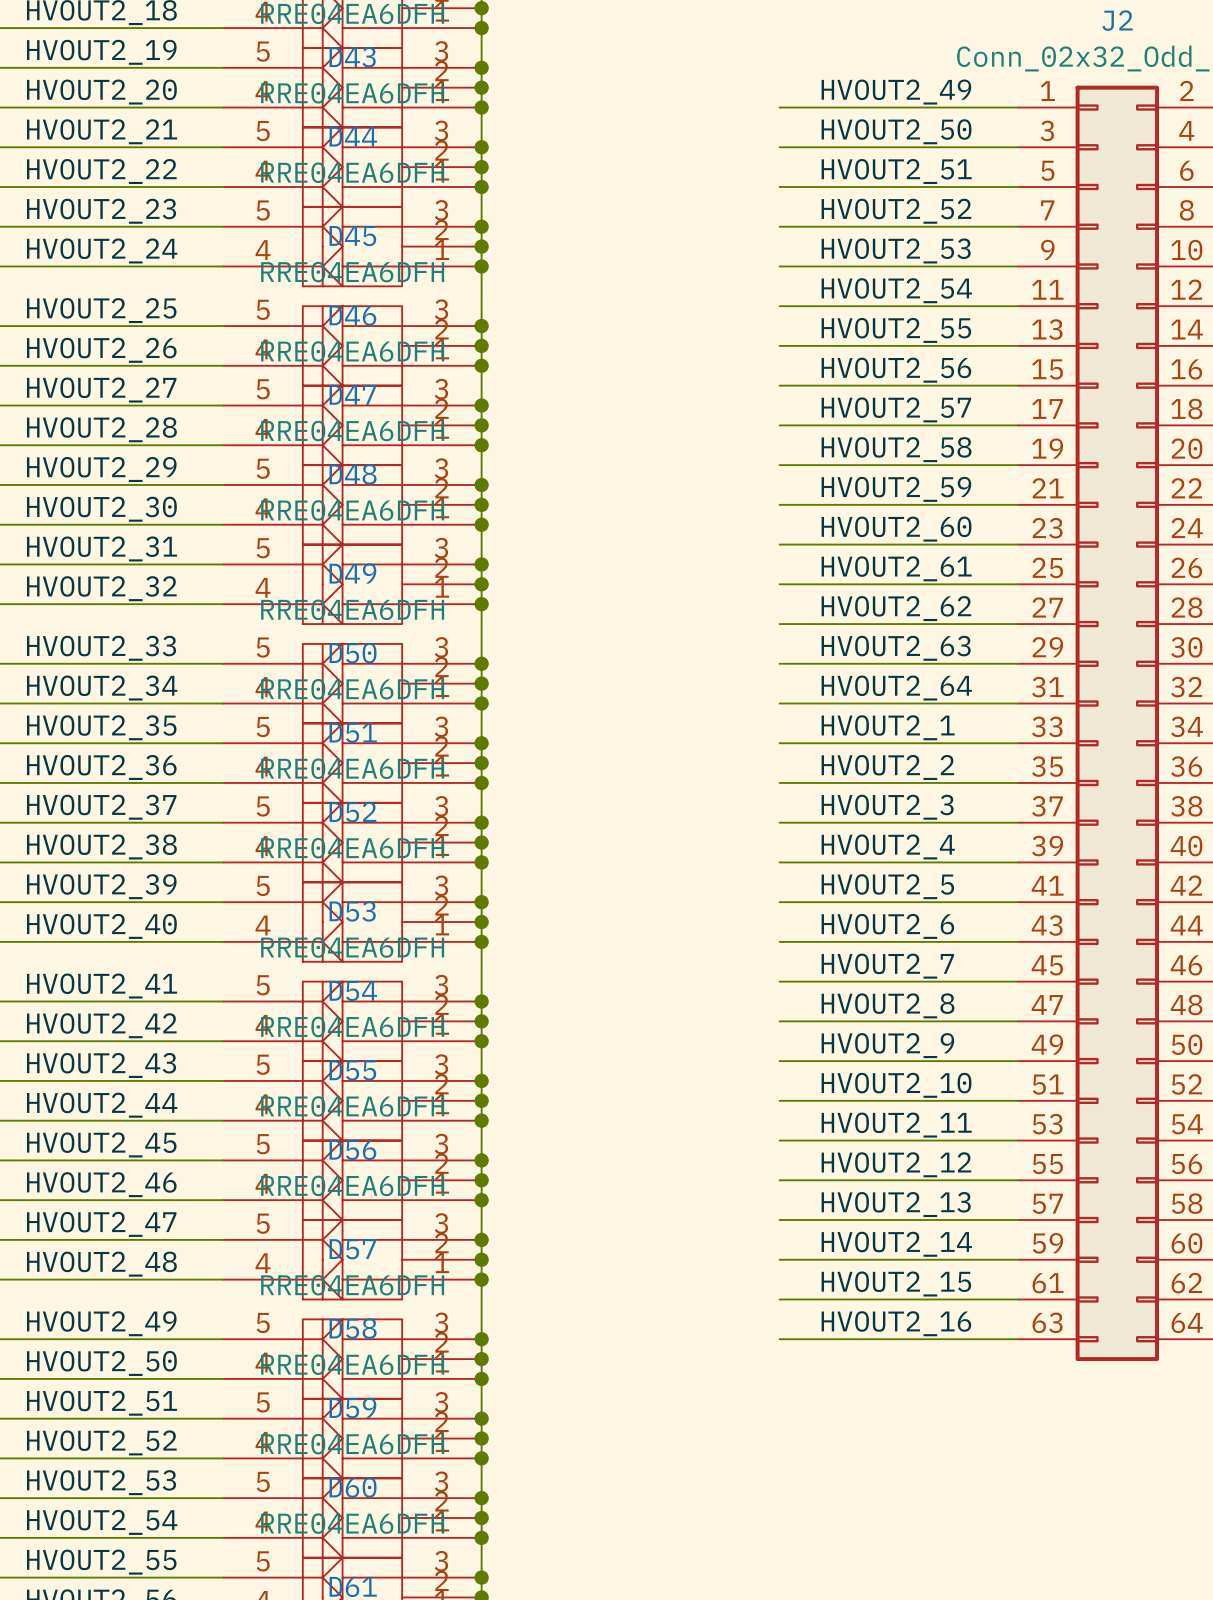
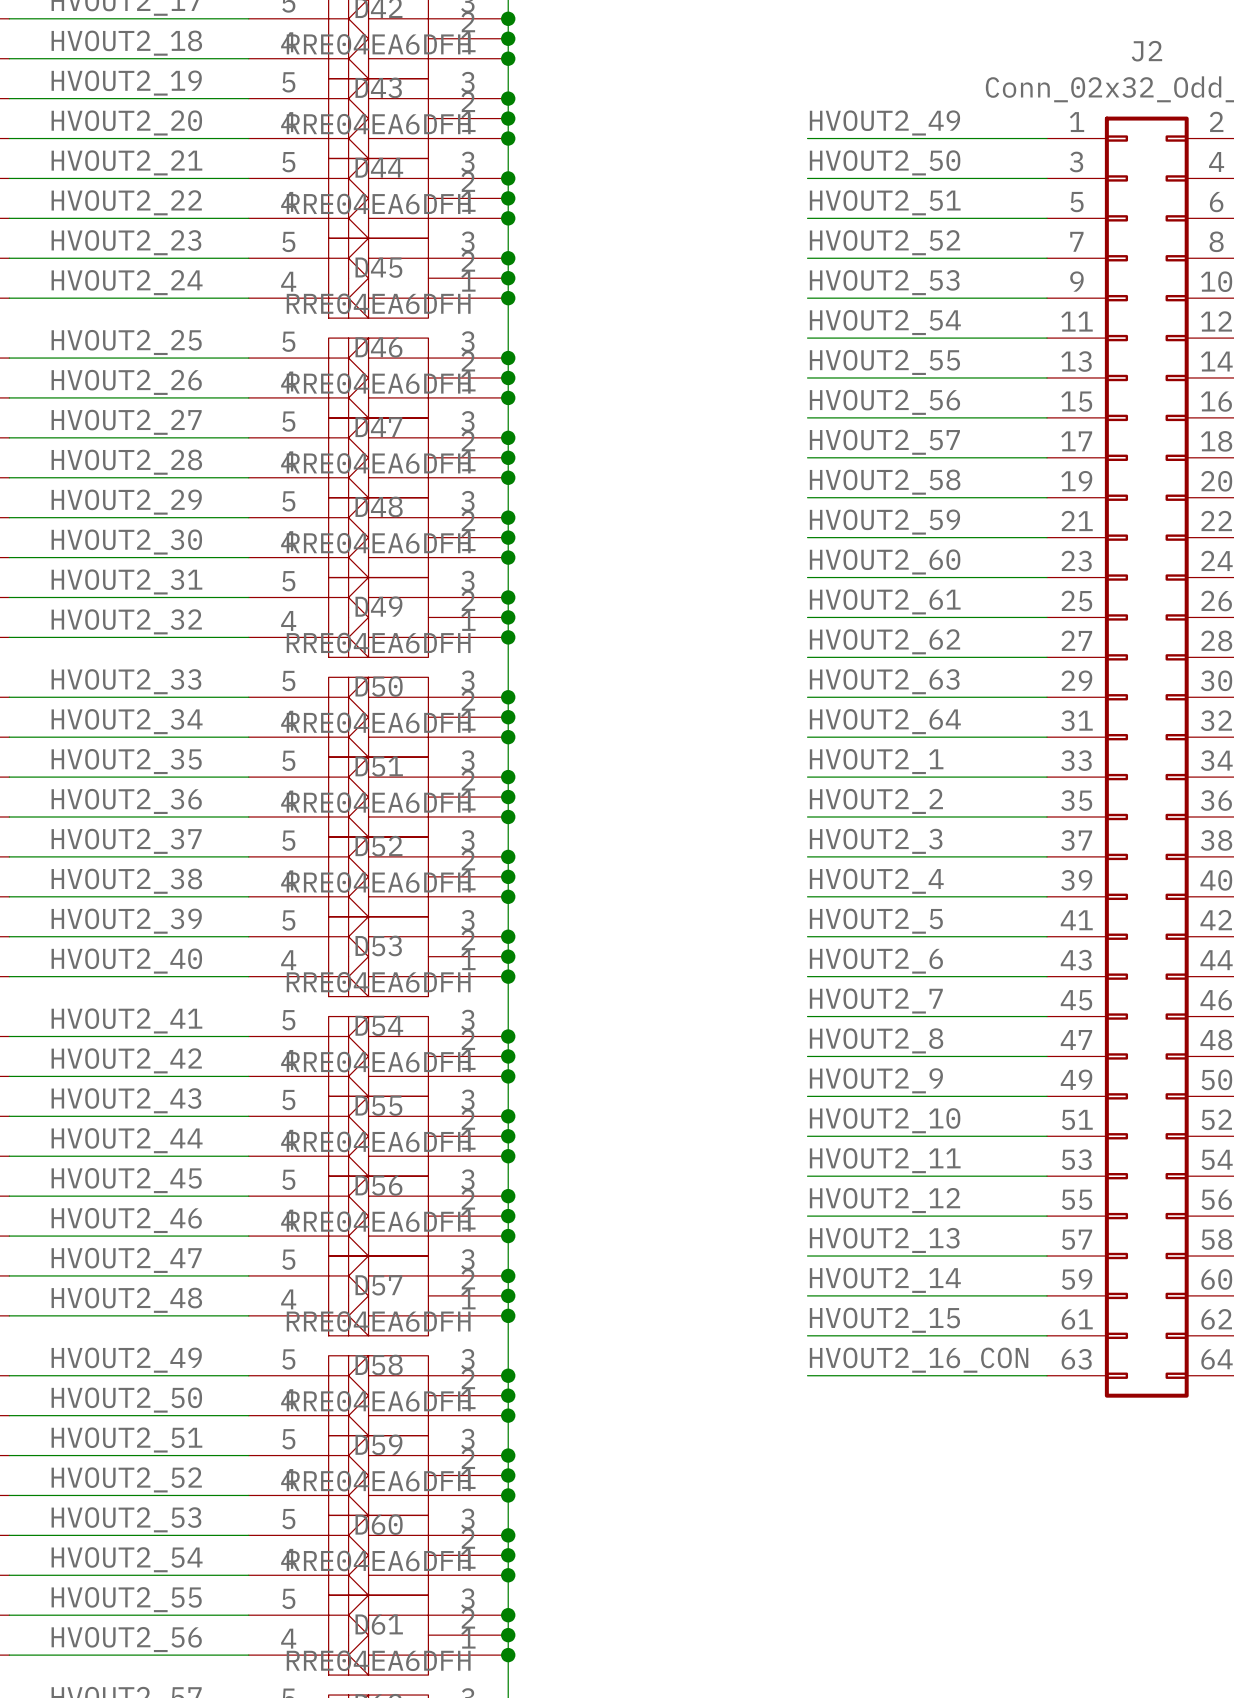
label position: HVOUT2_49 (896, 92) -> HVOUT2_49 (884, 122)
label position: HVOUT2_50 (896, 131) -> HVOUT2_50 (885, 162)
label position: HVOUT2_51 (896, 171) -> HVOUT2_51 (885, 202)
label position: HVOUT2_52 (896, 211) -> HVOUT2_52 (884, 242)
label position: HVOUT2_53 (896, 250) -> HVOUT2_53 (884, 282)
label position: HVOUT2_54 (896, 290) -> HVOUT2_54 (885, 322)
label position: HVOUT2_55 (896, 330) -> HVOUT2_55 (884, 362)
label position: HVOUT2_56 (896, 370) -> HVOUT2_56 (884, 402)
label position: HVOUT2_57 (896, 409) -> HVOUT2_57 (884, 442)
label position: HVOUT2_58 (896, 449) -> HVOUT2_58 (885, 482)
label position: HVOUT2_59 (896, 489) -> HVOUT2_59 (884, 522)
label position: HVOUT2_60 (896, 529) -> HVOUT2_60 (885, 561)
label position: HVOUT2_61 (896, 568) -> HVOUT2_61 (885, 601)
label position: HVOUT2_62 (896, 608) -> HVOUT2_62 (884, 641)
label position: HVOUT2_63 (896, 648) -> HVOUT2_63 (884, 681)
label position: HVOUT2_64 (896, 688) -> HVOUT2_64 (885, 721)
label position: HVOUT2_1 (888, 727) -> HVOUT2_1 (876, 761)
label position: HVOUT2_2 (887, 767) -> HVOUT2_2 (876, 801)
label position: HVOUT2_3 (887, 807) -> HVOUT2_3 (876, 841)
label position: HVOUT2_4 (888, 846) -> HVOUT2_4 (876, 881)
label position: HVOUT2_5 (887, 886) -> HVOUT2_5 (876, 921)
label position: HVOUT2_6 (887, 926) -> HVOUT2_6 (876, 961)
label position: HVOUT2_7 (887, 966) -> HVOUT2_7 (876, 1000)
label position: HVOUT2_8 (888, 1005) -> HVOUT2_8 (876, 1040)
label position: HVOUT2_9 (887, 1045) -> HVOUT2_9 (876, 1080)
label position: HVOUT2_10 (896, 1085) -> HVOUT2_10 (885, 1120)
label position: HVOUT2_11 (896, 1125) -> HVOUT2_11 (885, 1160)
label position: HVOUT2_12 (896, 1164) -> HVOUT2_12 (884, 1200)
label position: HVOUT2_13 (896, 1204) -> HVOUT2_13 (884, 1240)
label position: HVOUT2_14 (896, 1244) -> HVOUT2_14 (885, 1280)
label position: HVOUT2_15 (896, 1283) -> HVOUT2_15 (884, 1320)
label: HVOUT2_16 (896, 1323) -> HVOUT2_16_CON (919, 1360)

